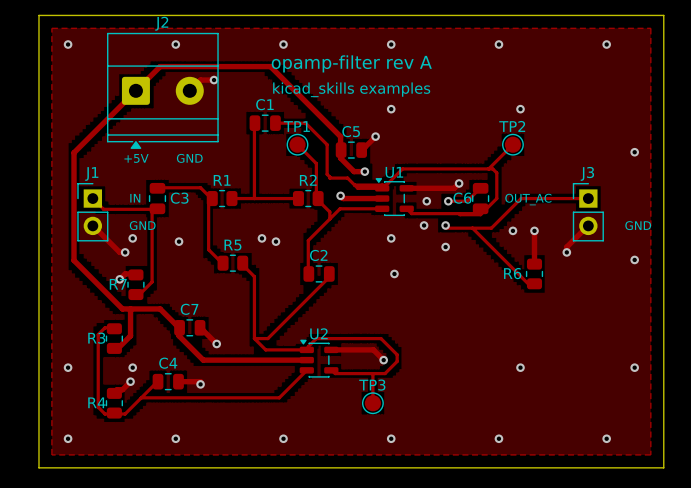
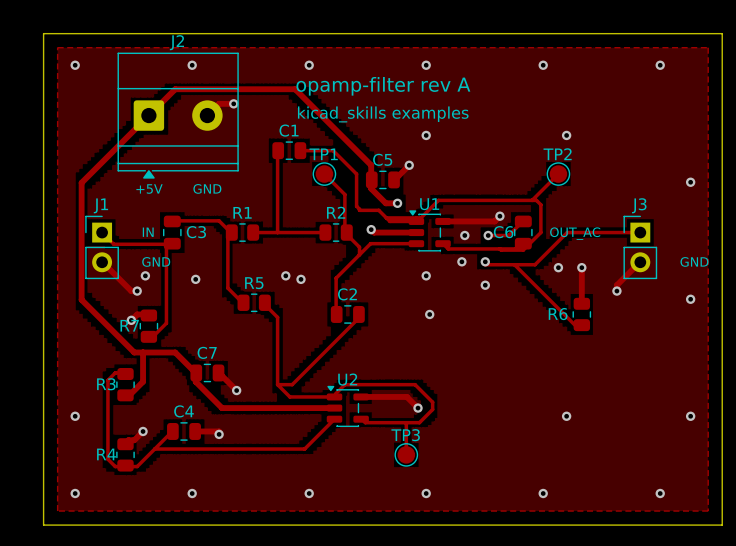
via: (132, 367) -> none

